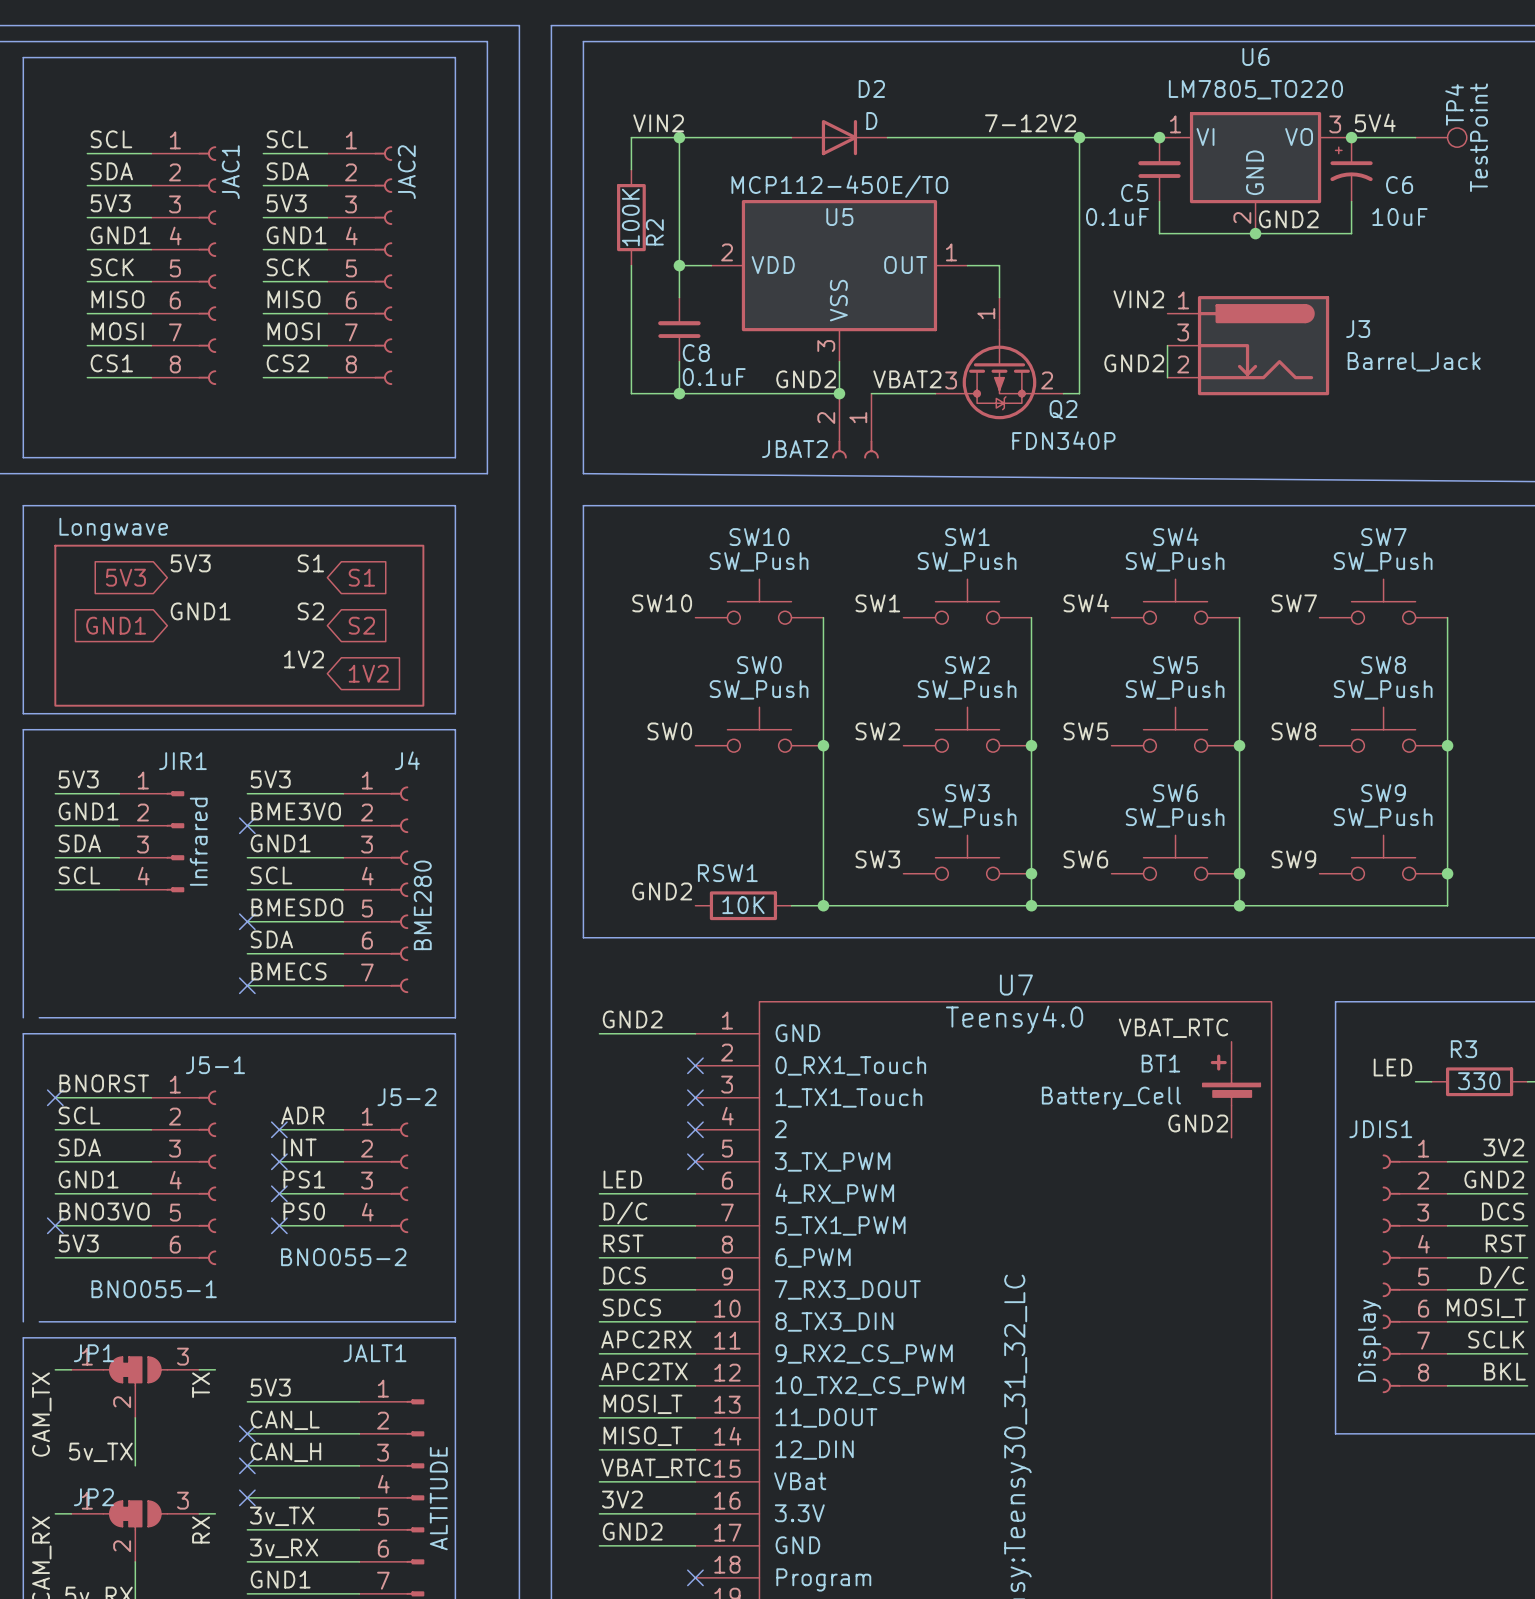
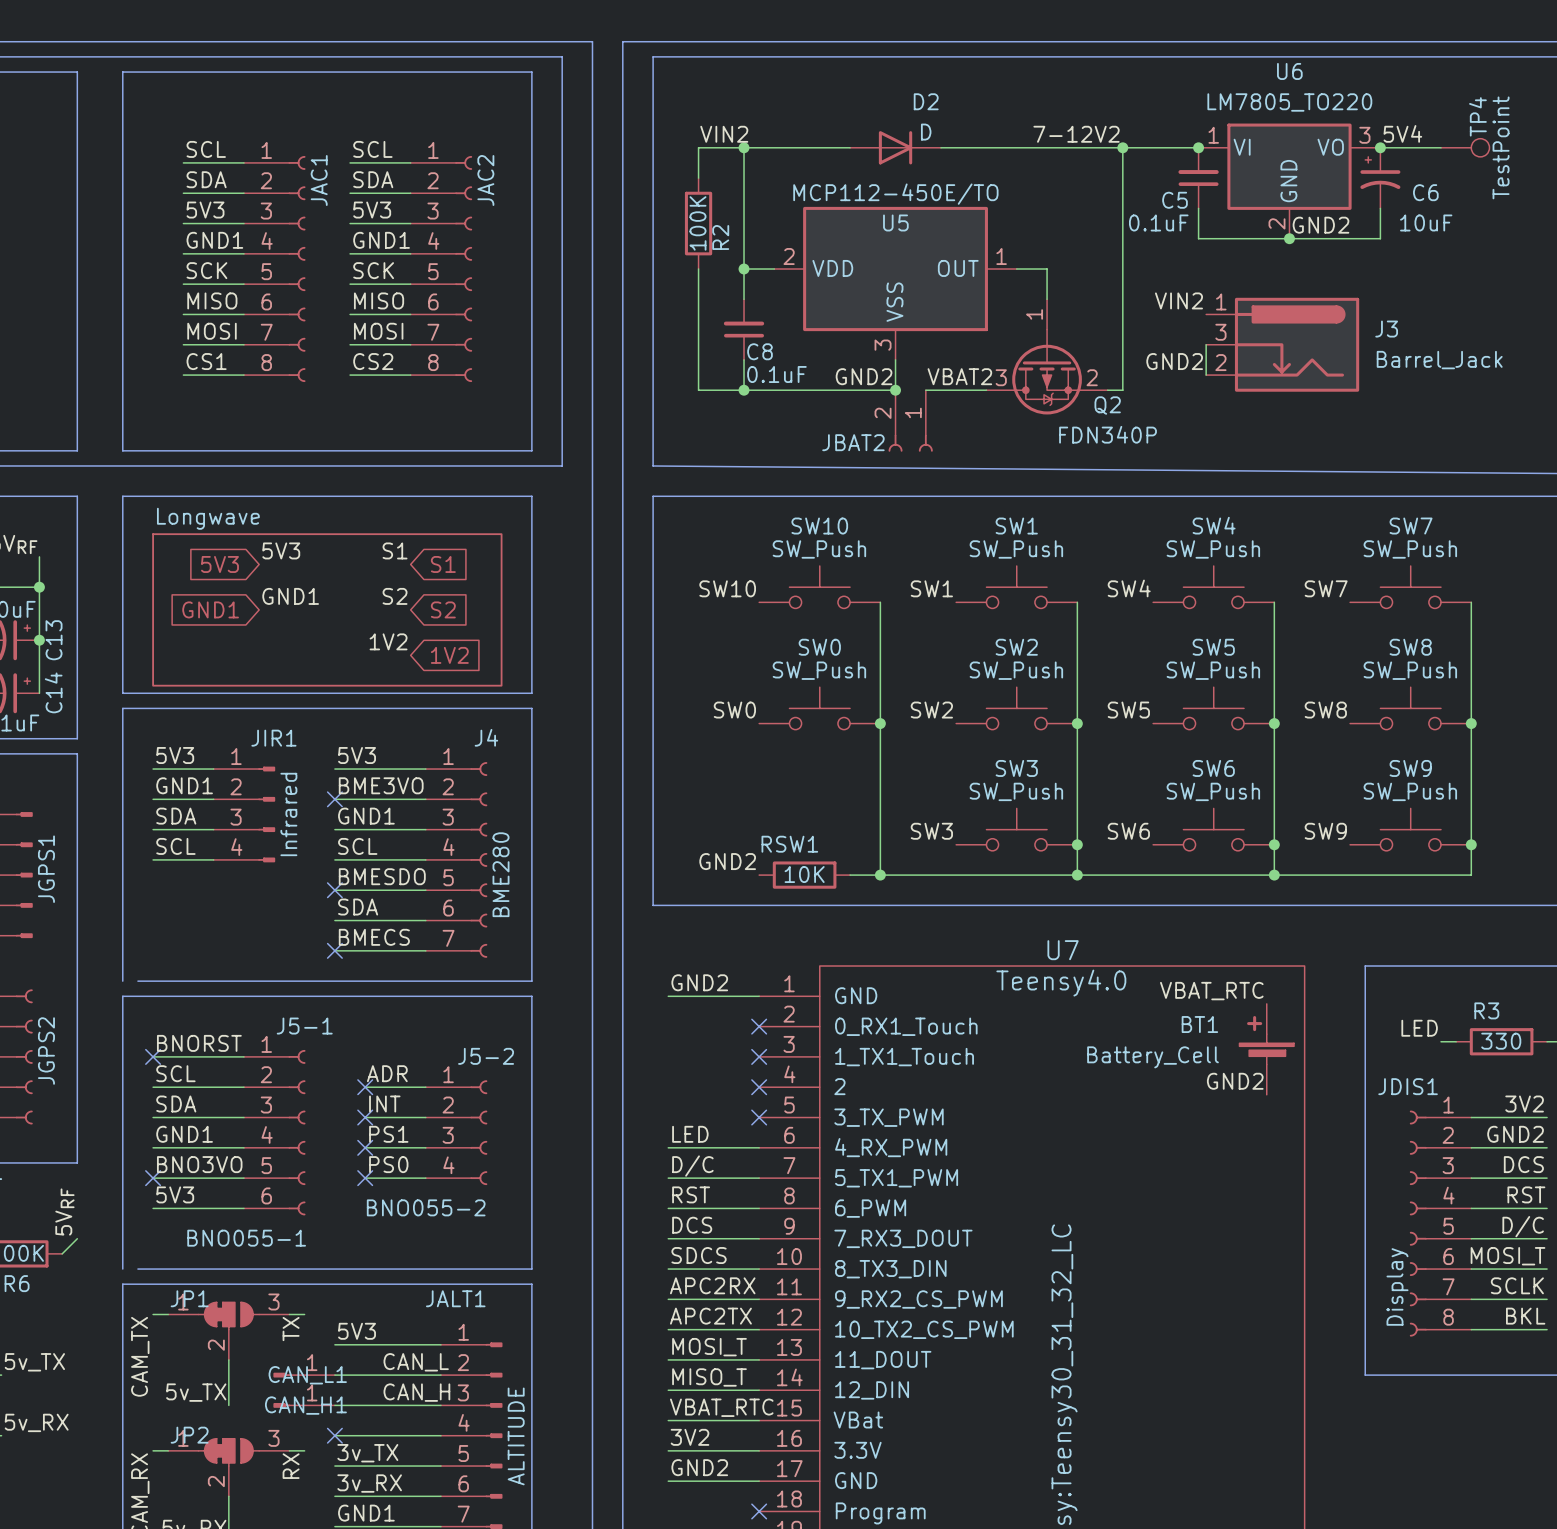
label position: CAN_L (285, 1420) -> CAN_L (416, 1362)
CAN_L1: none -> (304, 1375)
no-connect mark: (247, 1433) -> none
label position: CAN_H (285, 1452) -> CAN_H (416, 1392)
CAN_H1: none -> (304, 1405)
no-connect mark: (247, 1465) -> none

